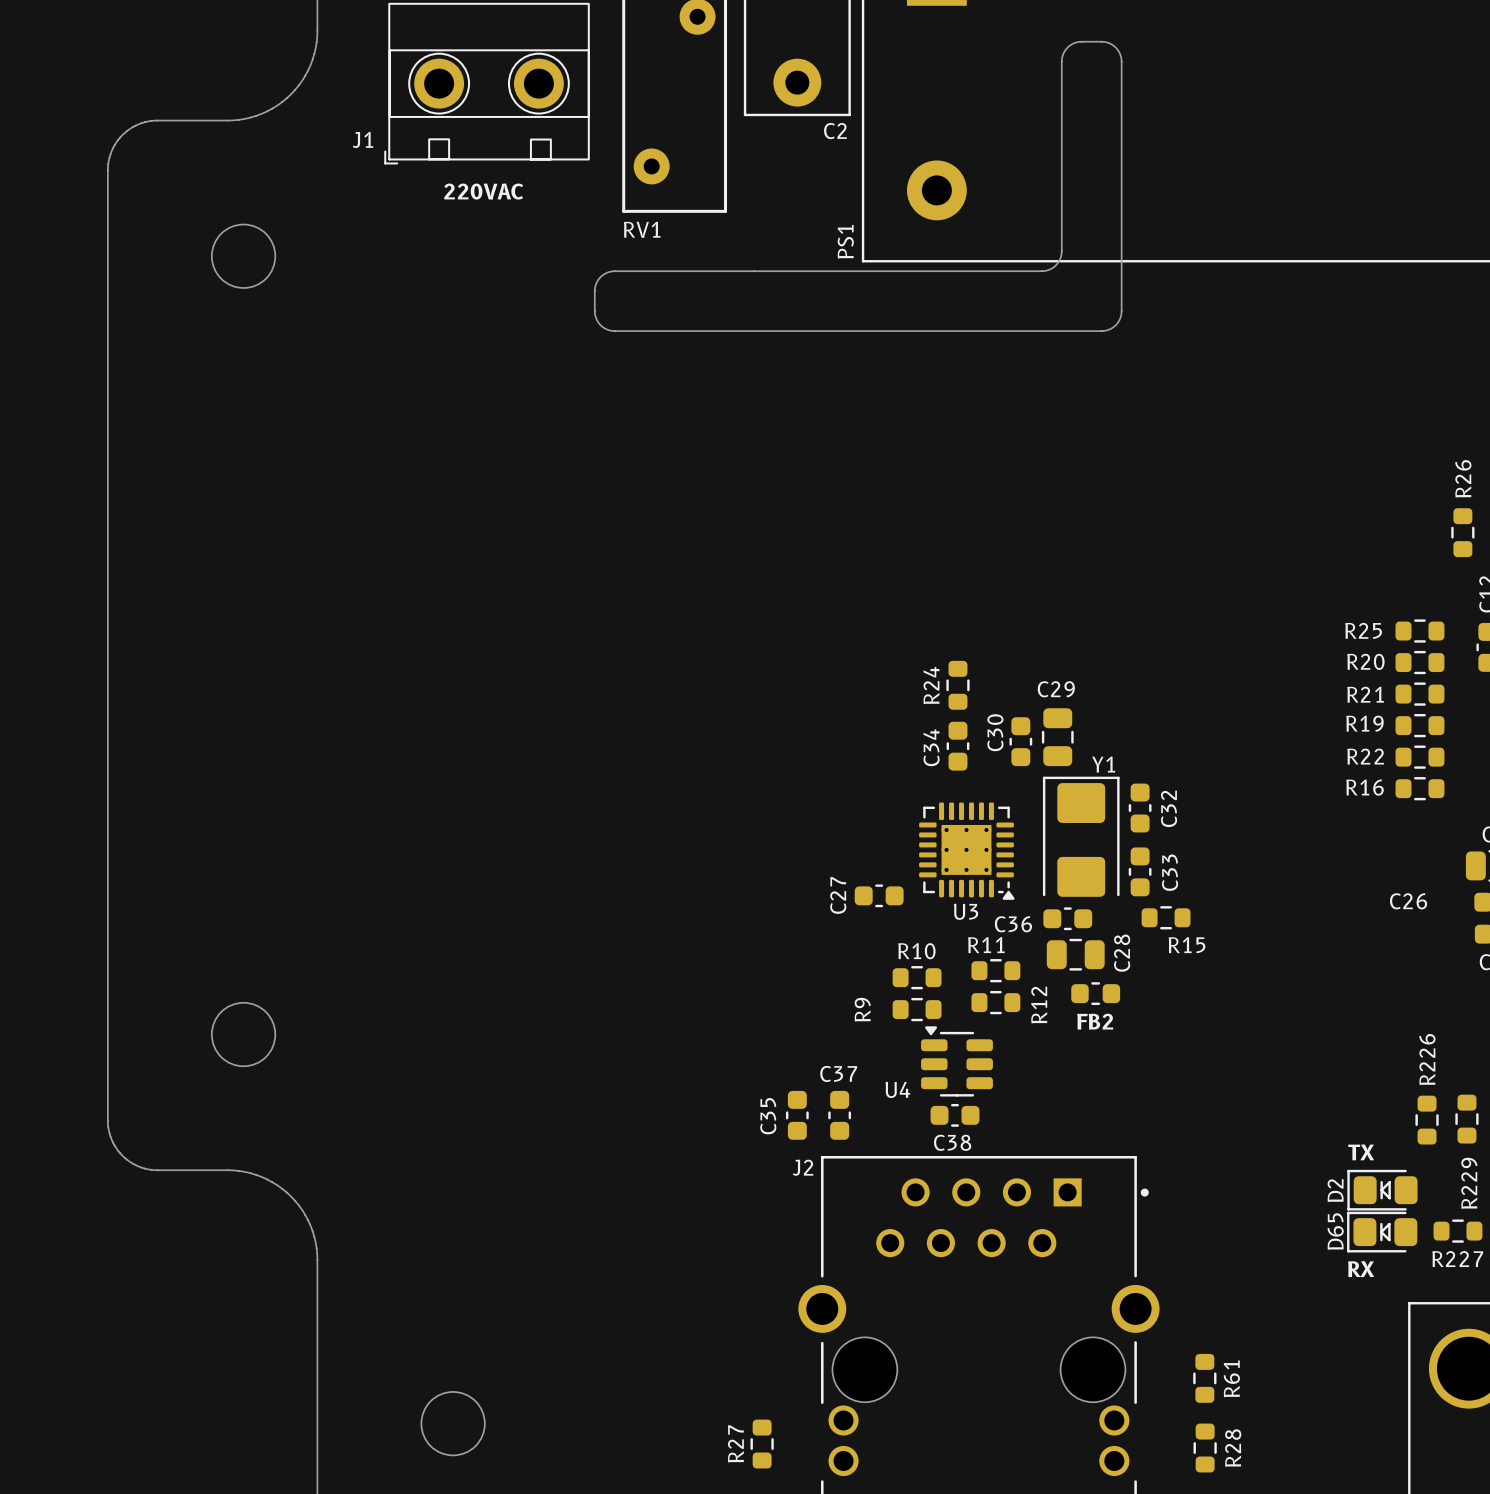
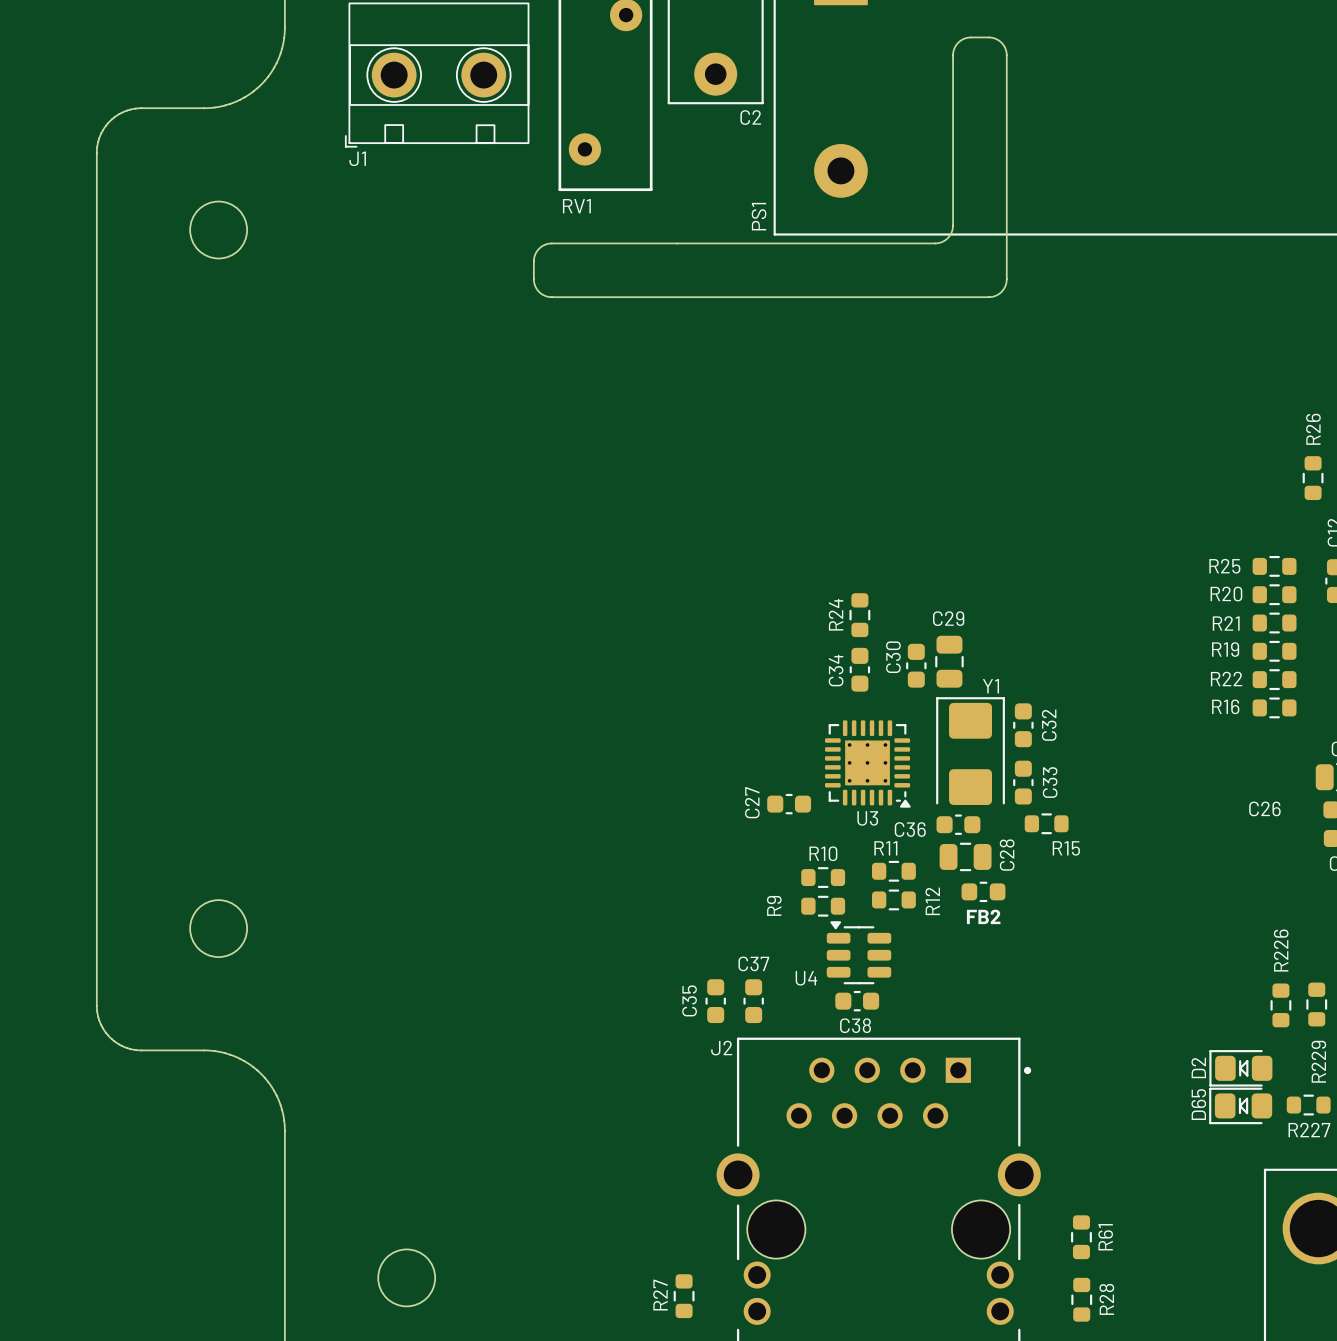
J1 name position: J1 (362, 140) -> J1 (357, 158)
text: 220VAC (483, 191) -> none
text: TX (1361, 1152) -> none
text: RX (1361, 1269) -> none

